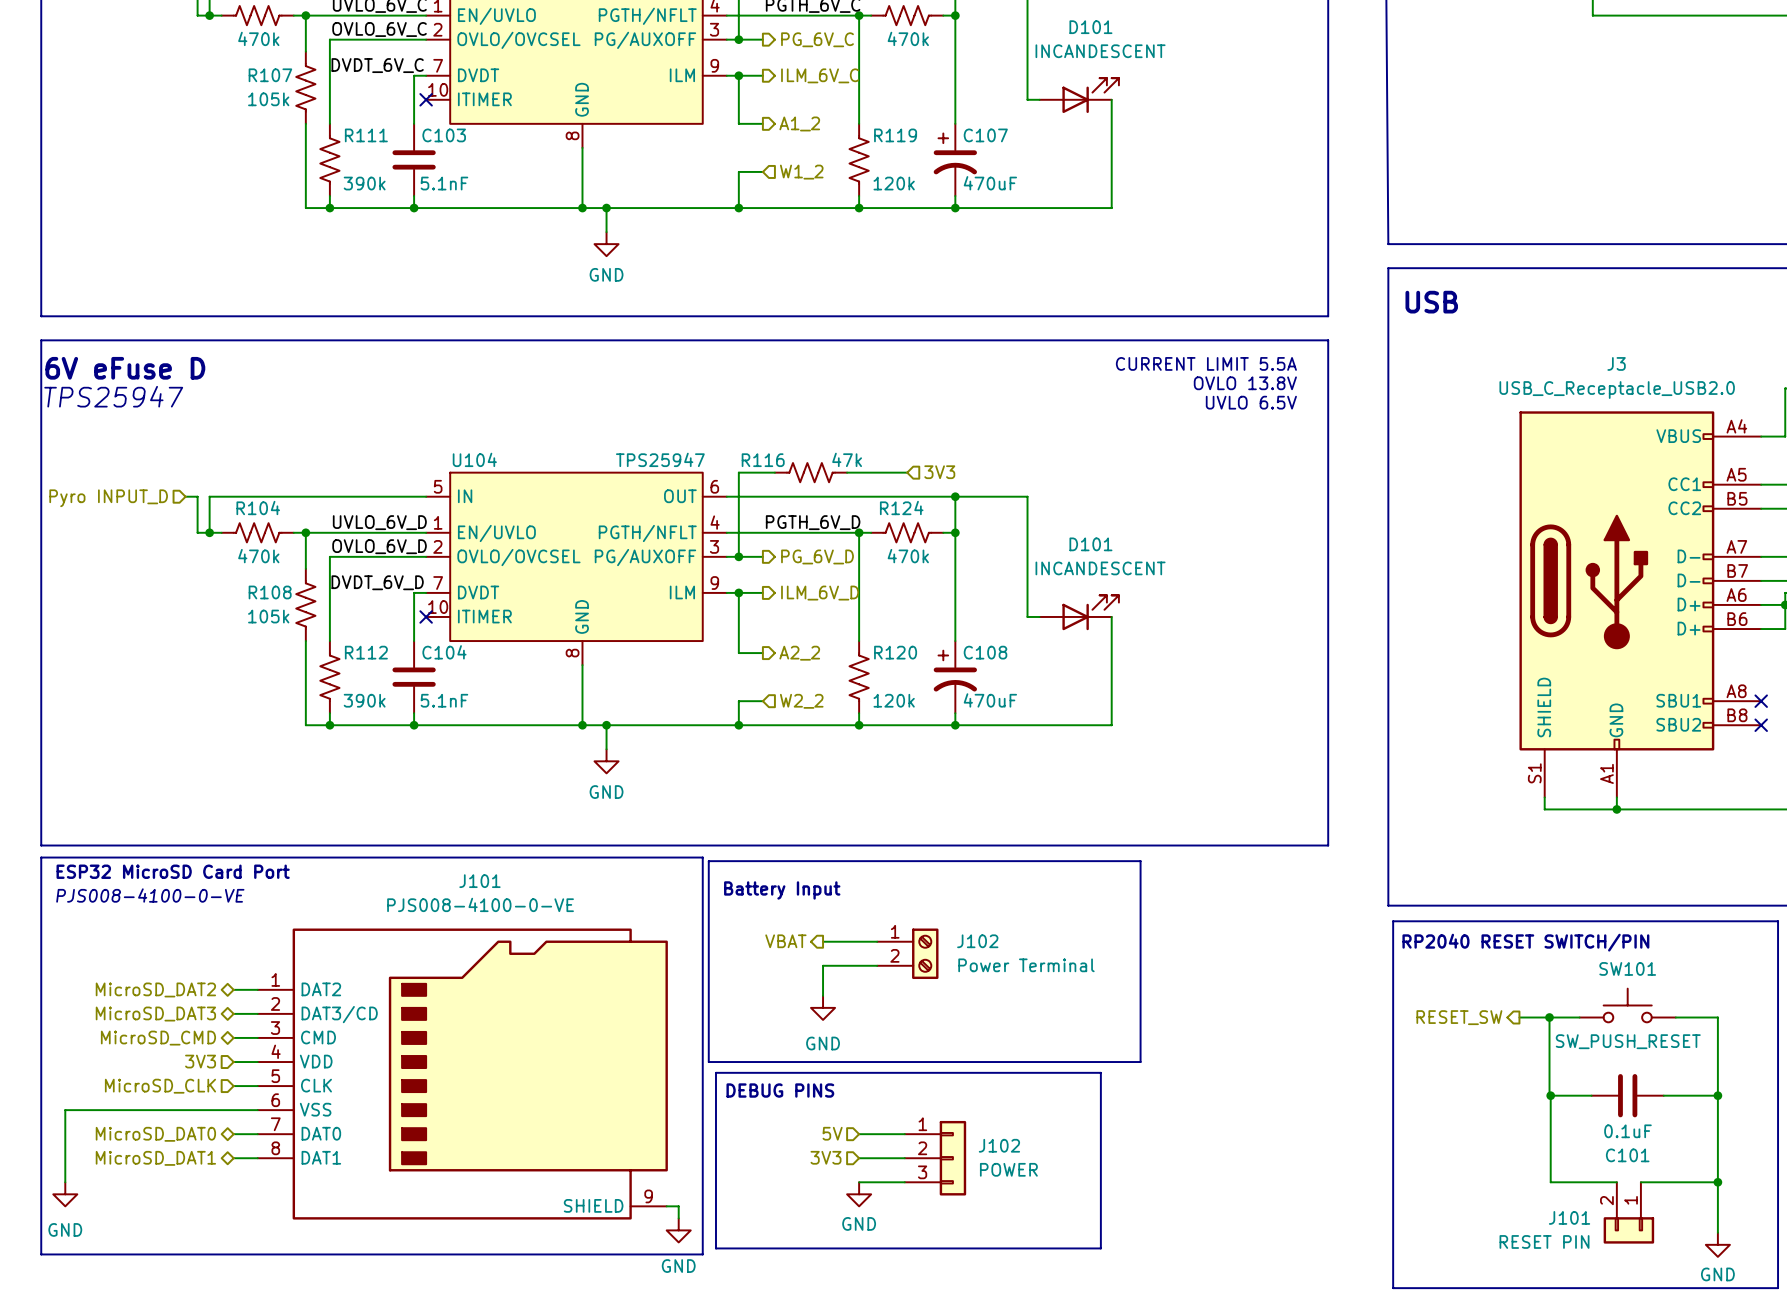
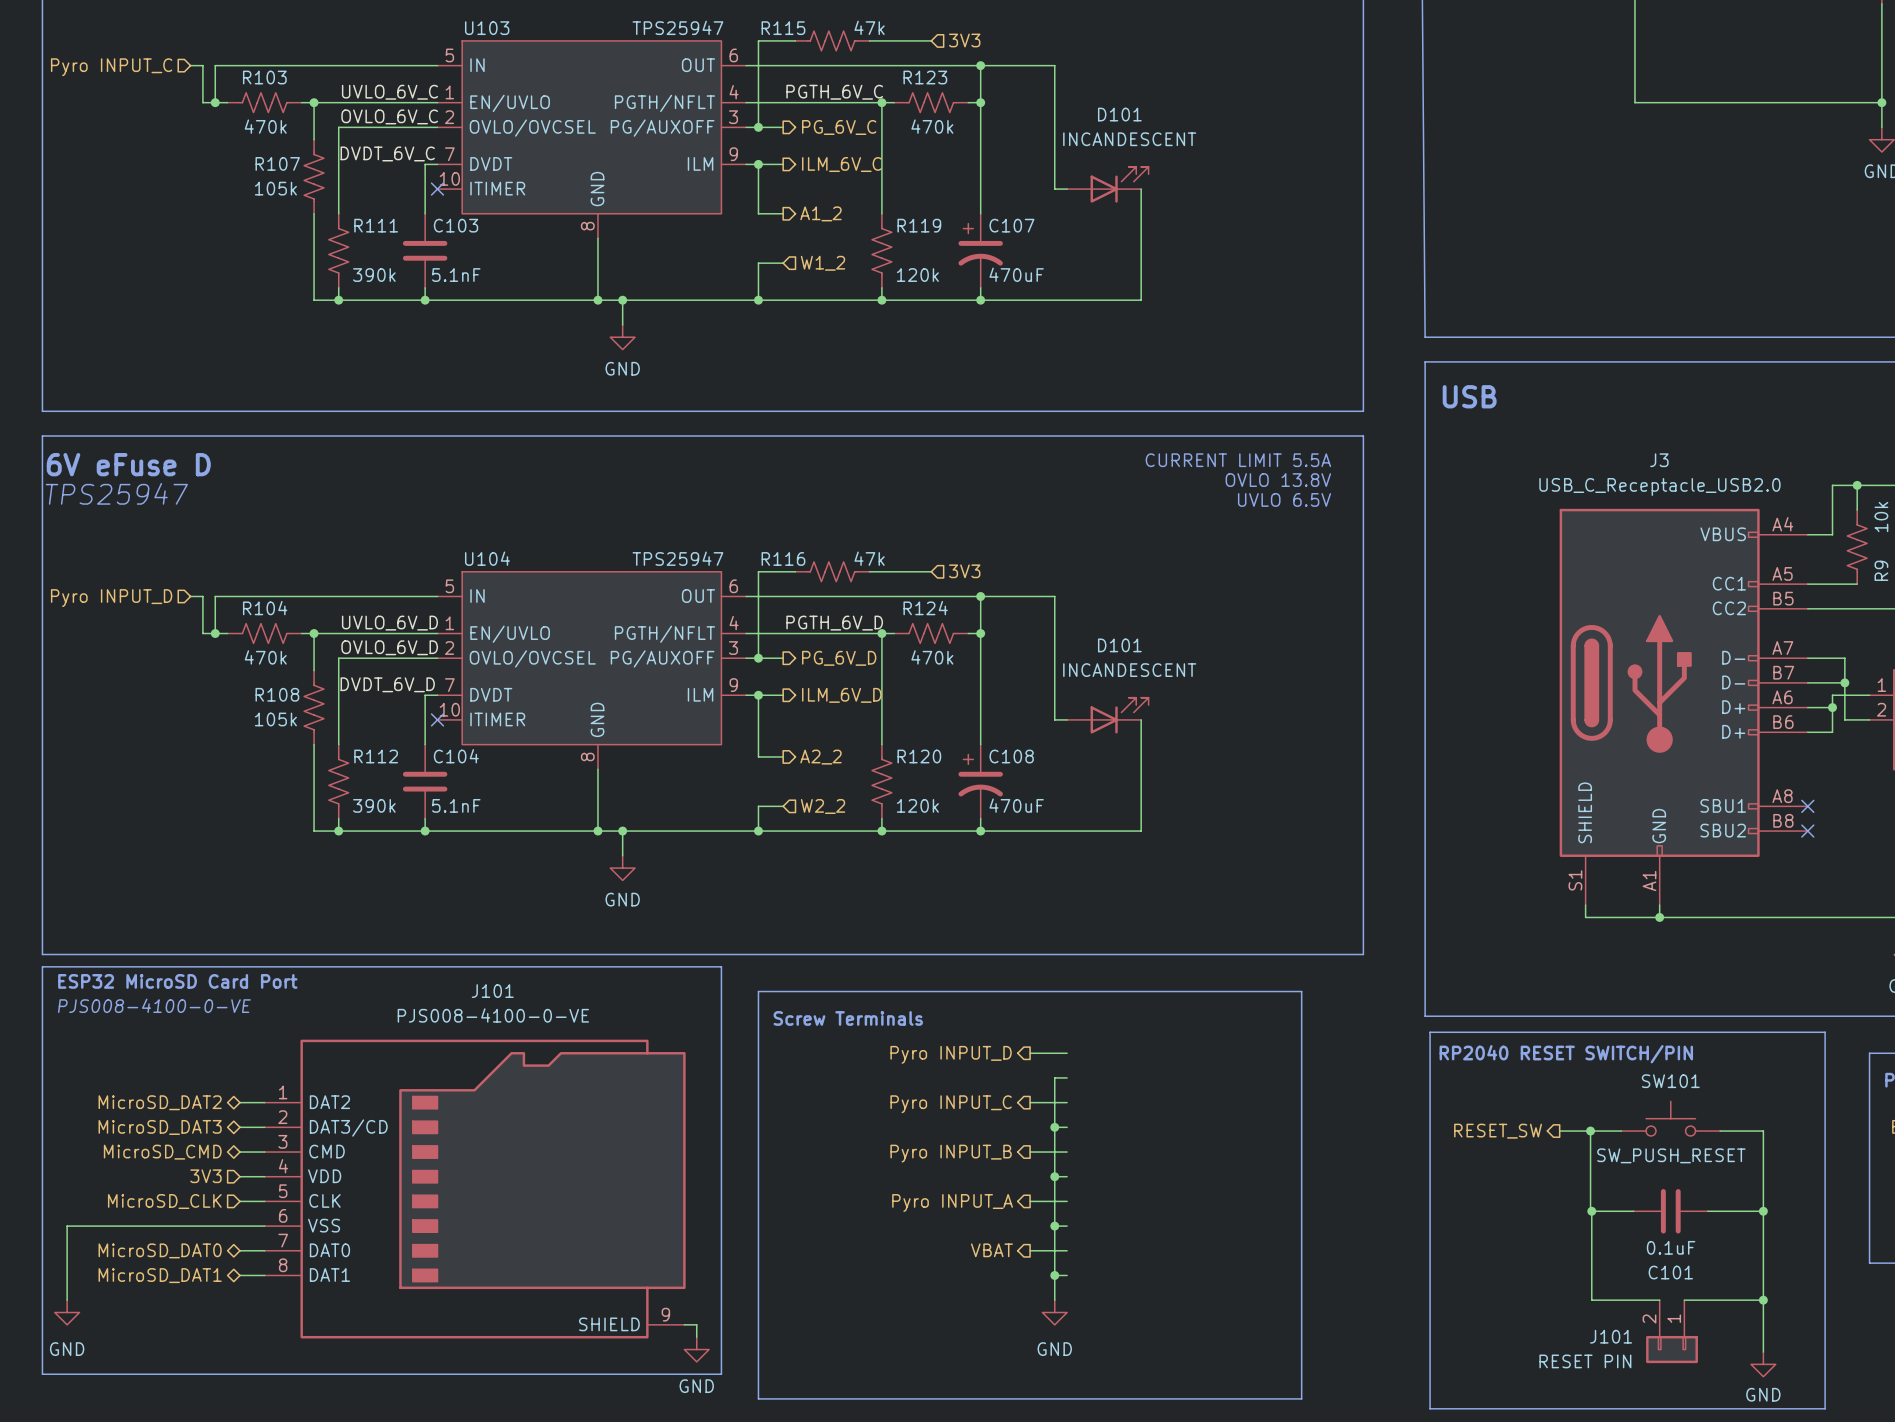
line: (708, 861) (1140, 861) (1140, 1062) (708, 1062) (708, 861) -> none
line: none -> (758, 991) (1301, 991) (1301, 1398) (758, 1398) (758, 991)
text: Battery Input (782, 890) -> none
text: none -> Screw Terminals (848, 1018)
hierarchical label: VBAT (785, 941) -> none
wire: (823, 941) (877, 941) -> none
wire: none -> (1030, 1053) (1067, 1053)
hierarchical label: none -> Pyro INPUT_D (951, 1054)
J102: Power Terminal (907, 953) -> none
wire: (877, 965) (823, 965) (823, 995) -> none
wire: none -> (1067, 1077) (1054, 1077) (1054, 1300)
wire: none -> (1030, 1102) (1067, 1102)
hierarchical label: none -> Pyro INPUT_C (951, 1104)
power symbol: GND (823, 1007) -> none
wire: none -> (1054, 1127) (1067, 1127)
junction: none -> (1054, 1127)
wire: none -> (1030, 1152) (1067, 1152)
hierarchical label: none -> Pyro INPUT_B (951, 1153)
junction: none -> (1054, 1176)
line: (715, 1072) (1100, 1072) (1100, 1248) (715, 1248) (715, 1072) -> none
wire: none -> (1030, 1201) (1067, 1201)
hierarchical label: none -> Pyro INPUT_A (952, 1203)
text: DEBUG PINS (780, 1090) -> none
wire: none -> (1054, 1226) (1067, 1226)
junction: none -> (1054, 1226)
hierarchical label: 5V (832, 1133) -> none
hierarchical label: none -> VBAT (991, 1250)
wire: (859, 1134) (904, 1134) -> none
wire: none -> (1030, 1250) (1067, 1250)
hierarchical label: 3V3 (826, 1157) -> none
wire: (859, 1158) (904, 1158) -> none
J102: POWER (935, 1158) -> none
wire: none -> (1054, 1275) (1067, 1275)
junction: none -> (1054, 1275)
wire: (859, 1182) (904, 1182) -> none
power symbol: GND (859, 1194) -> none
power symbol: none -> GND (1054, 1312)

